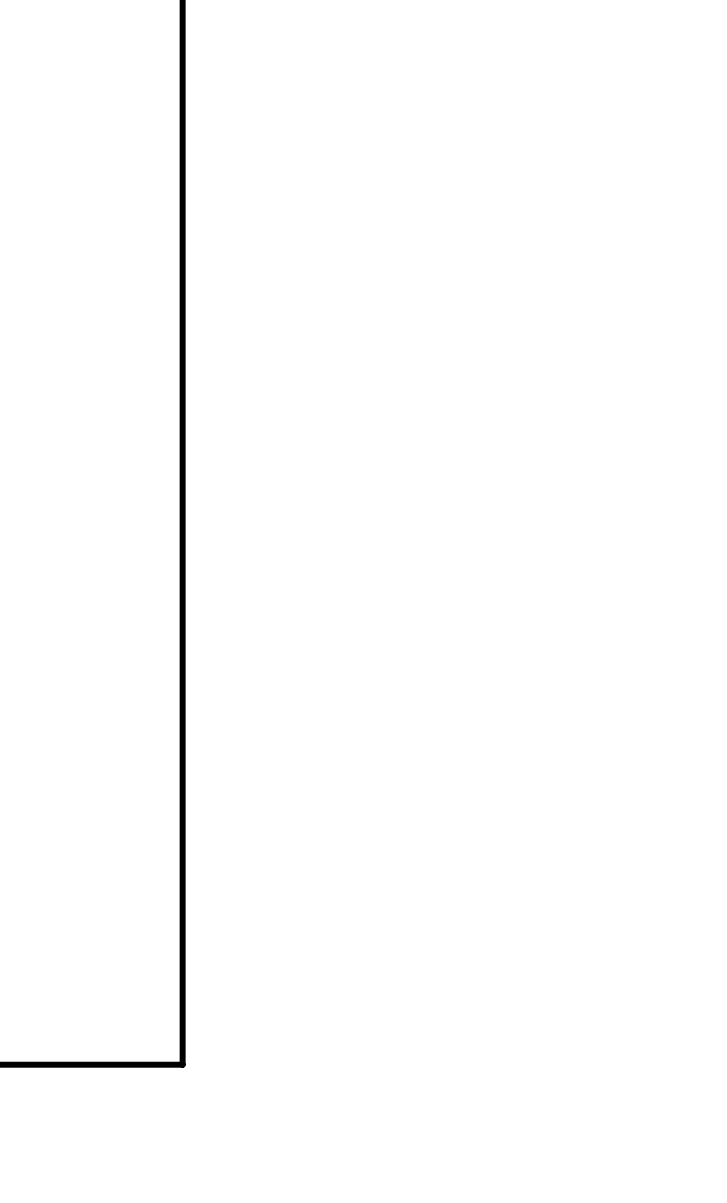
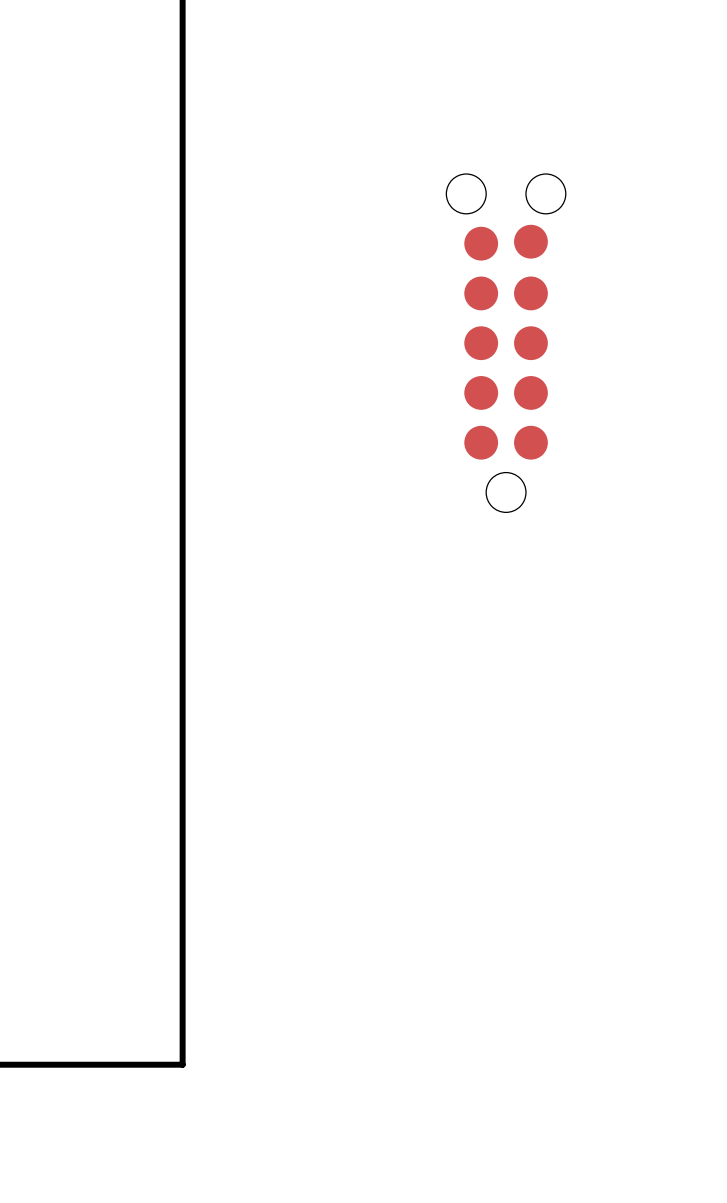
part: none -> (506, 343)

